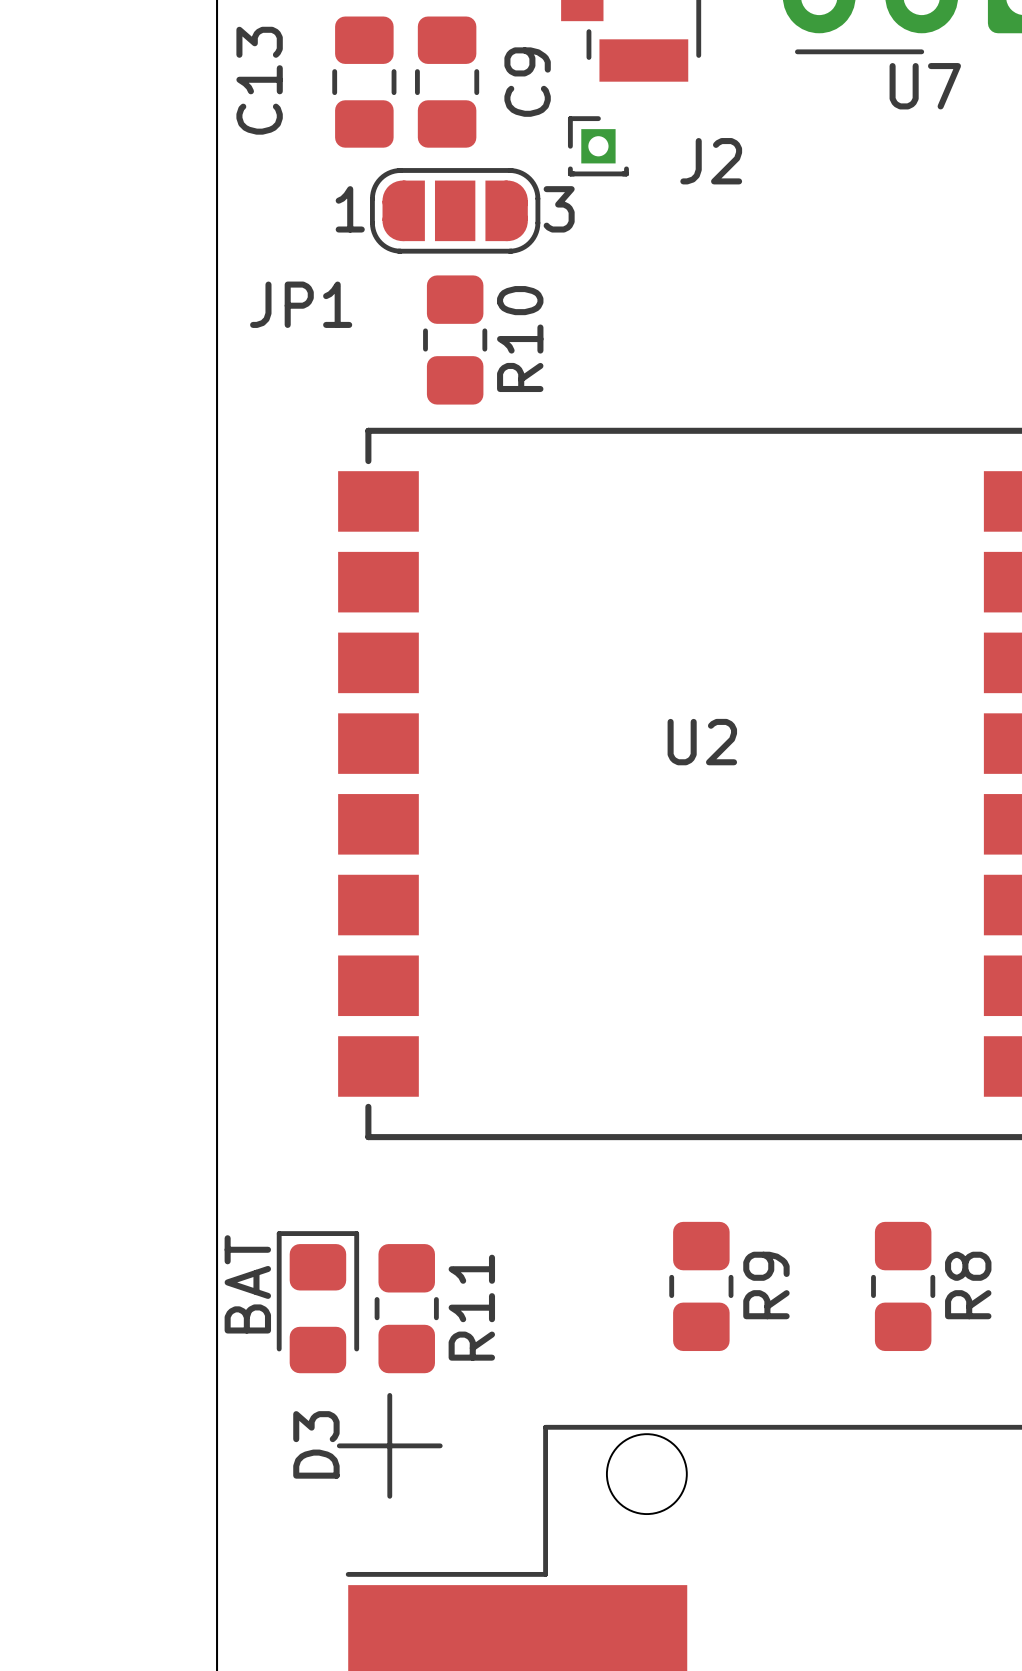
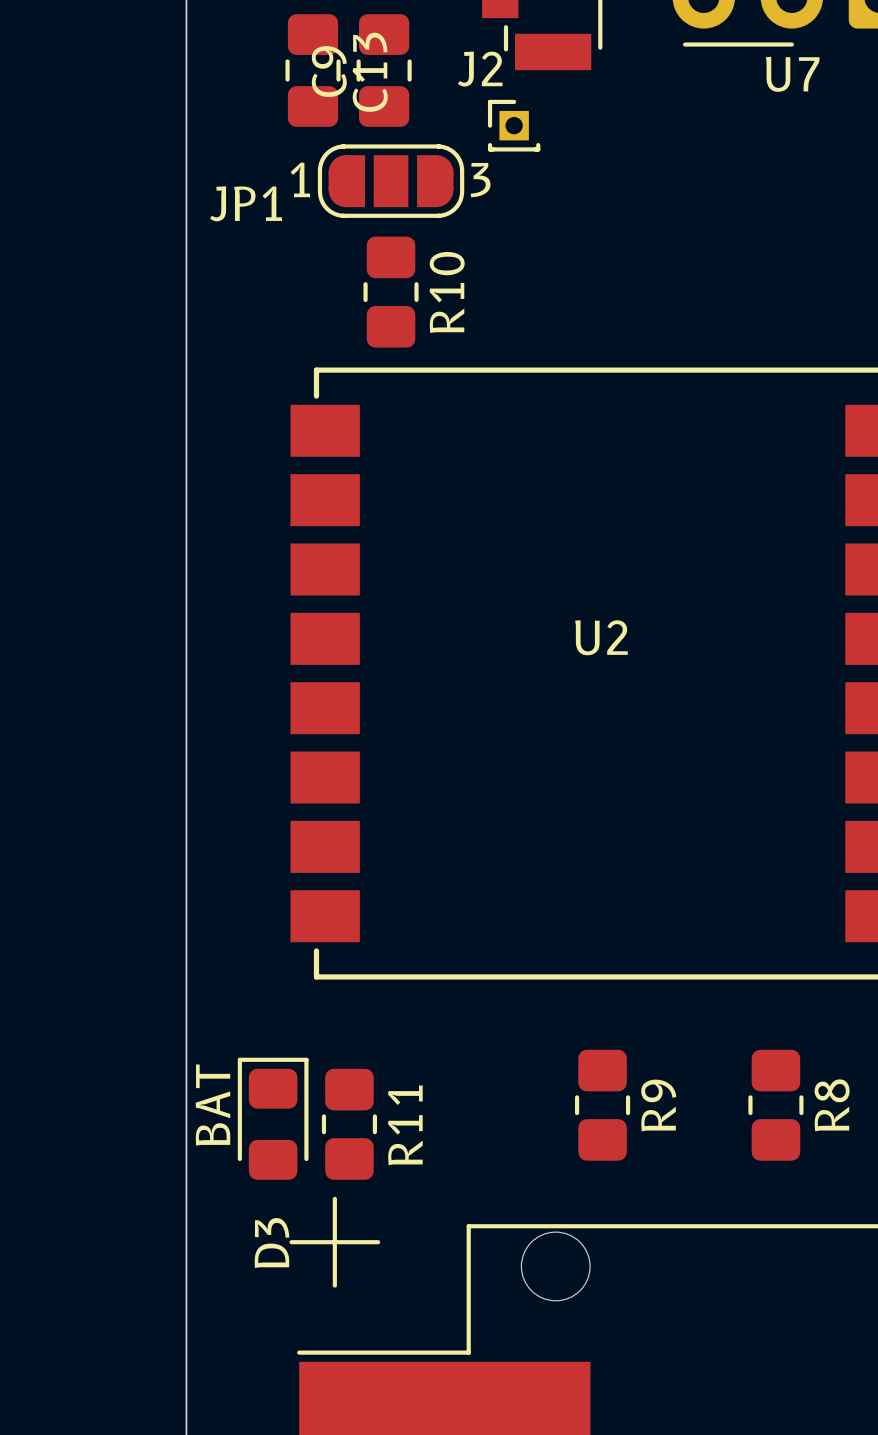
C13 name position: C13 (259, 80) -> C13 (370, 72)
C9 name position: C9 (527, 82) -> C9 (329, 71)
J2 name position: J2 (711, 161) -> J2 (480, 69)
JP1 name position: JP1 (301, 304) -> JP1 (246, 203)

